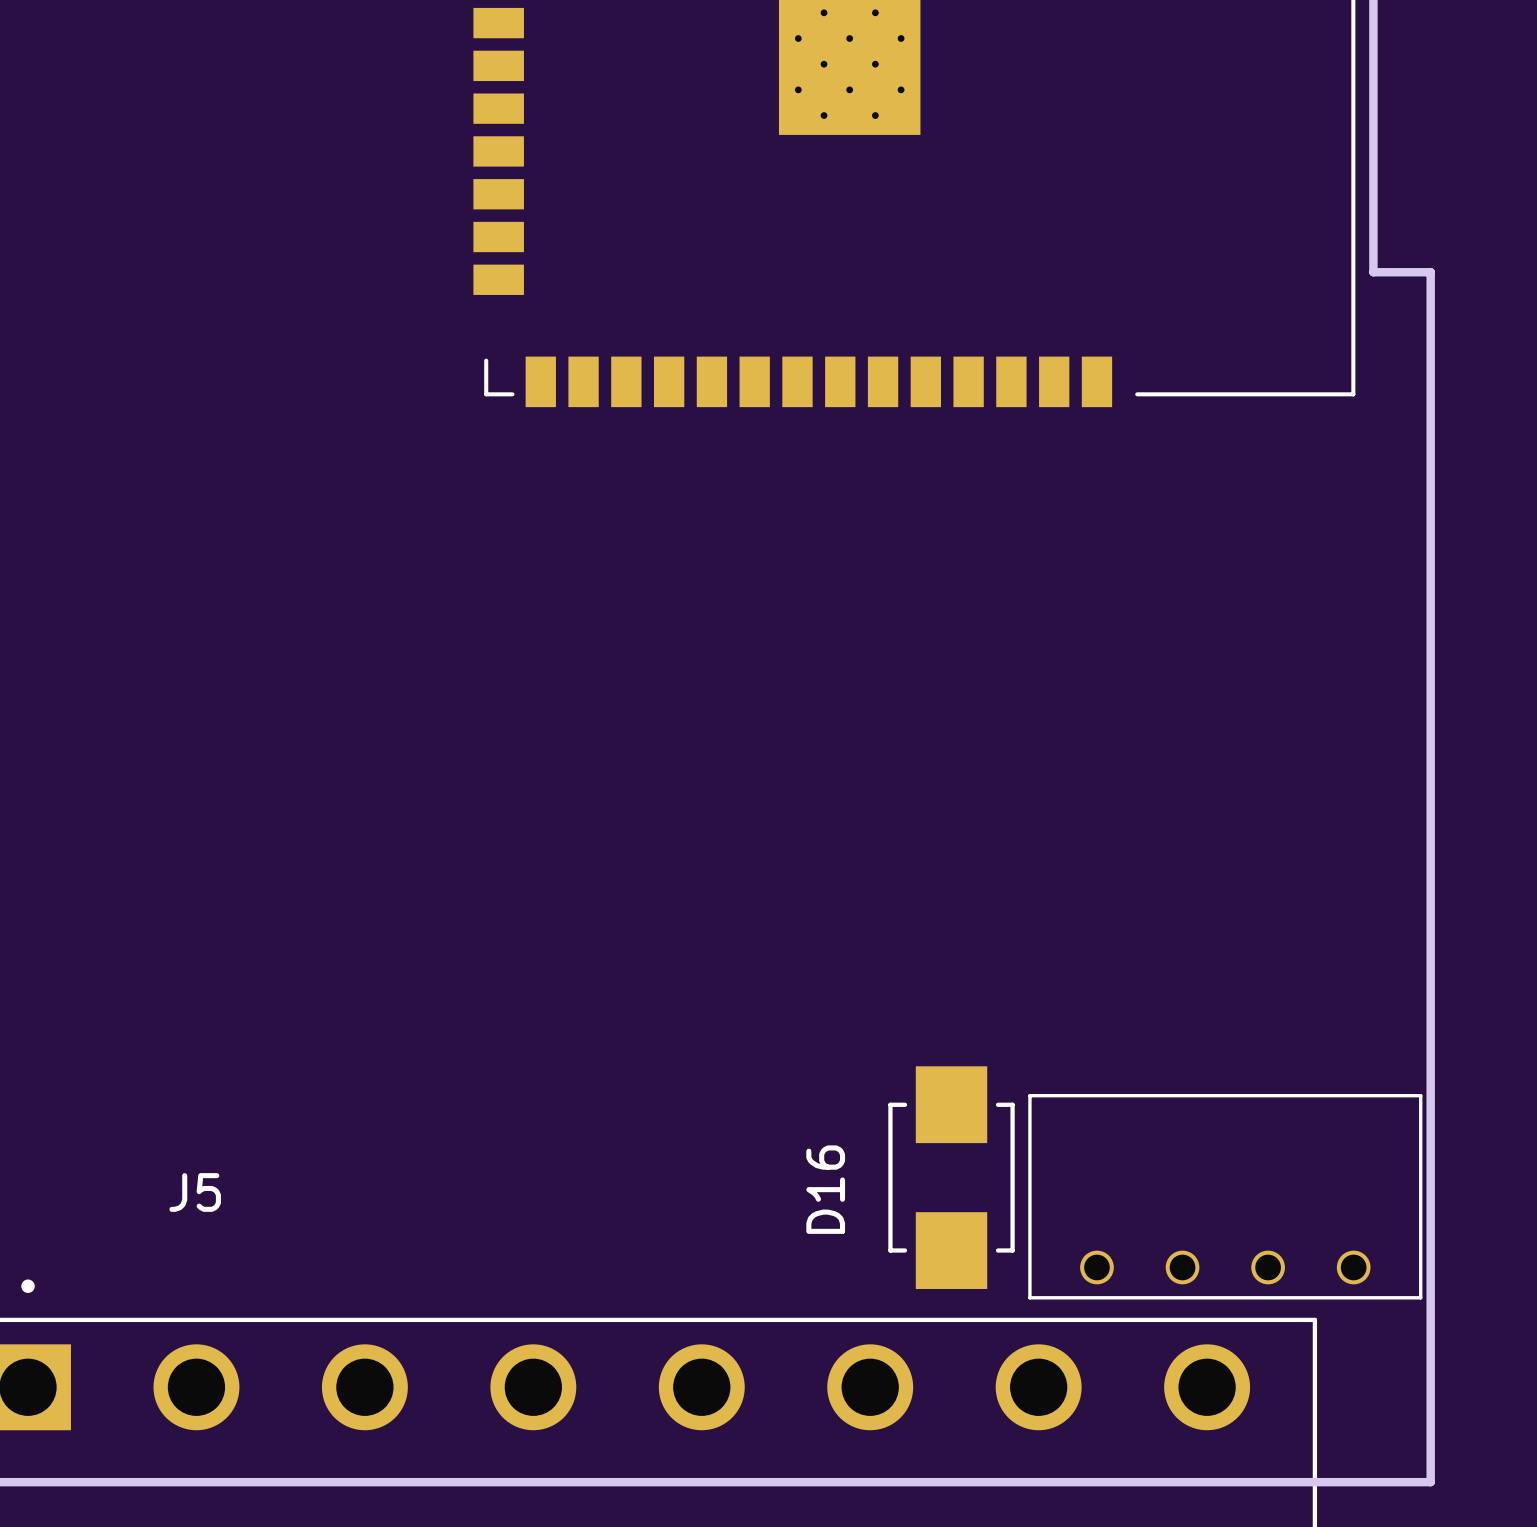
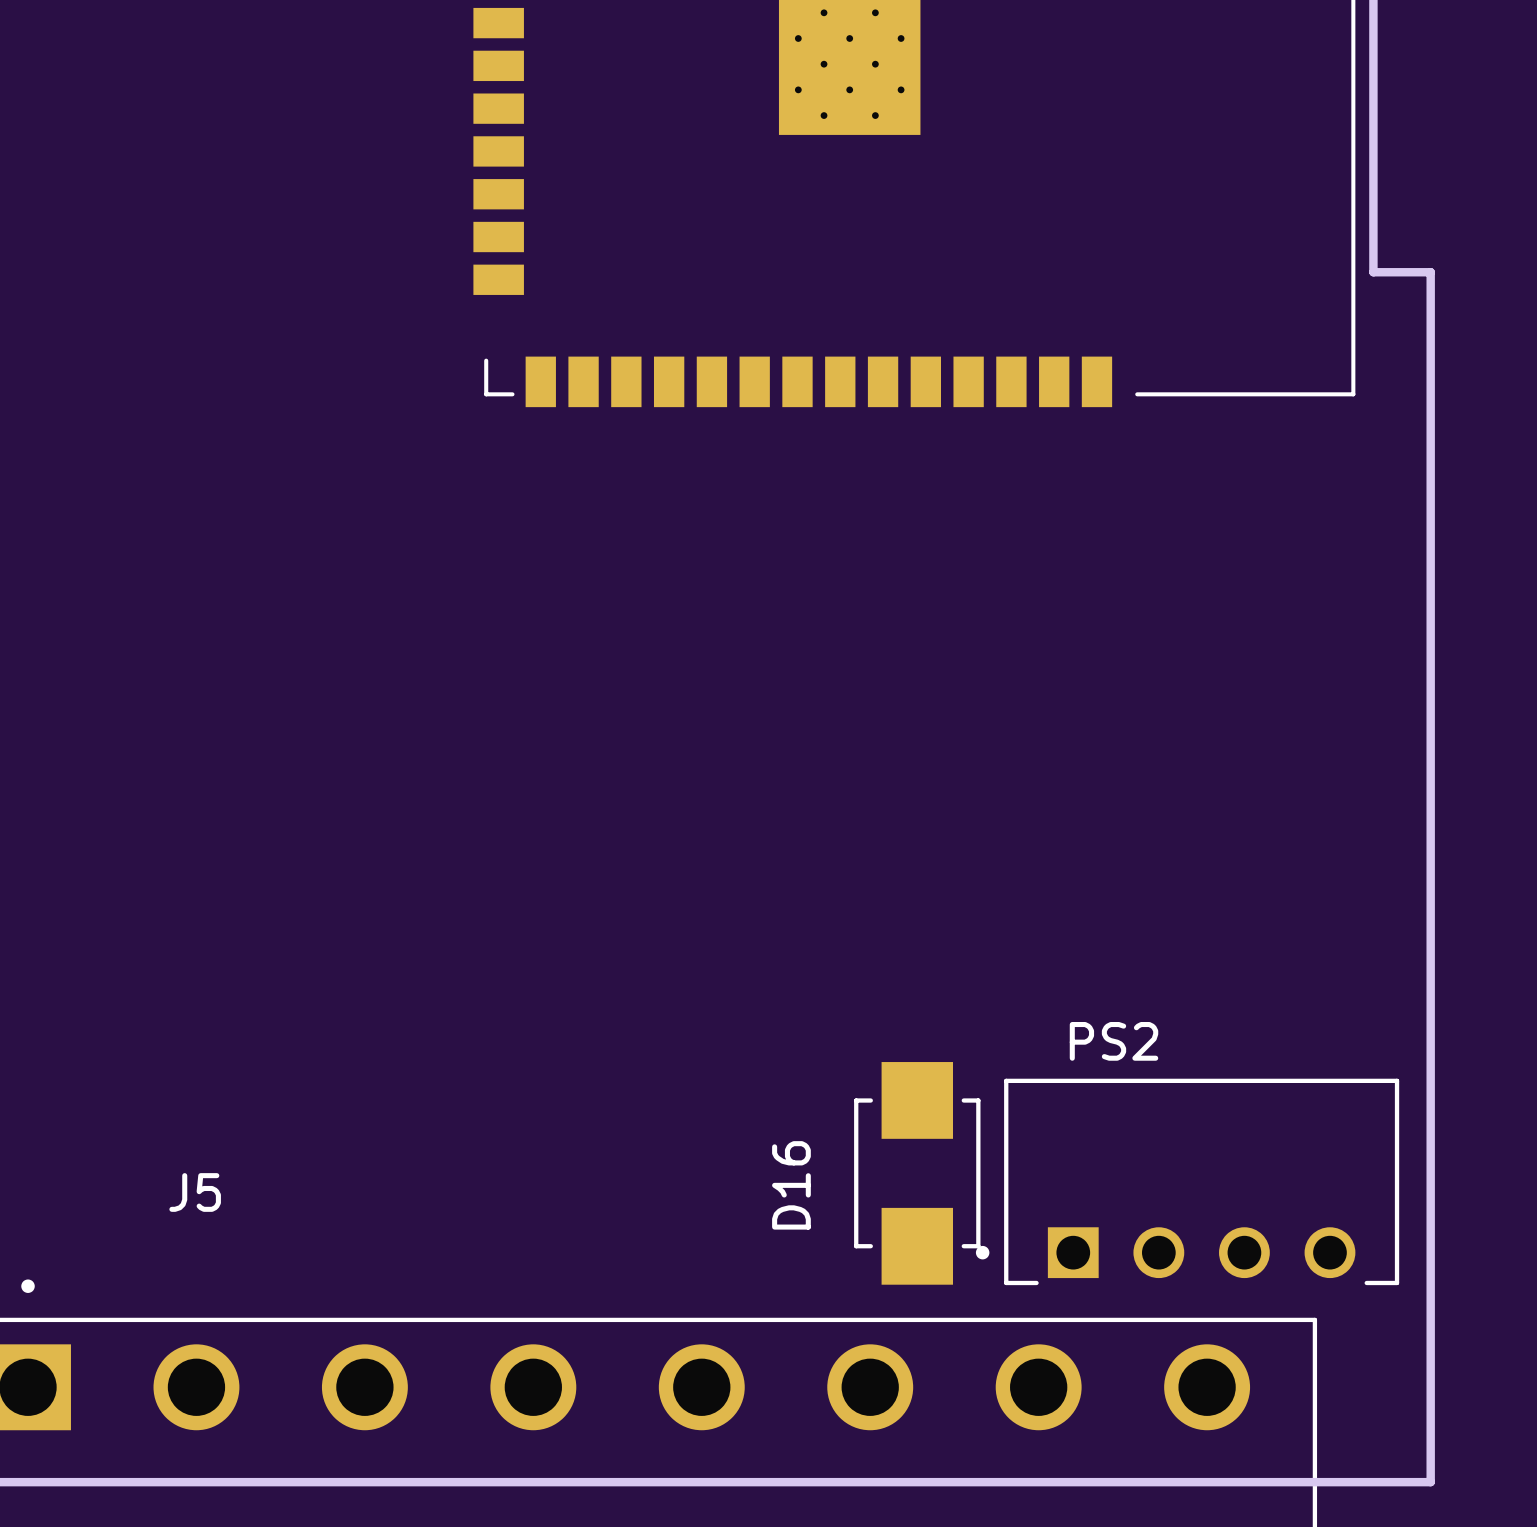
D16 position: (951, 1177) -> (917, 1173)
PS2: none -> (1187, 1181)
part: (1225, 1196) -> none

